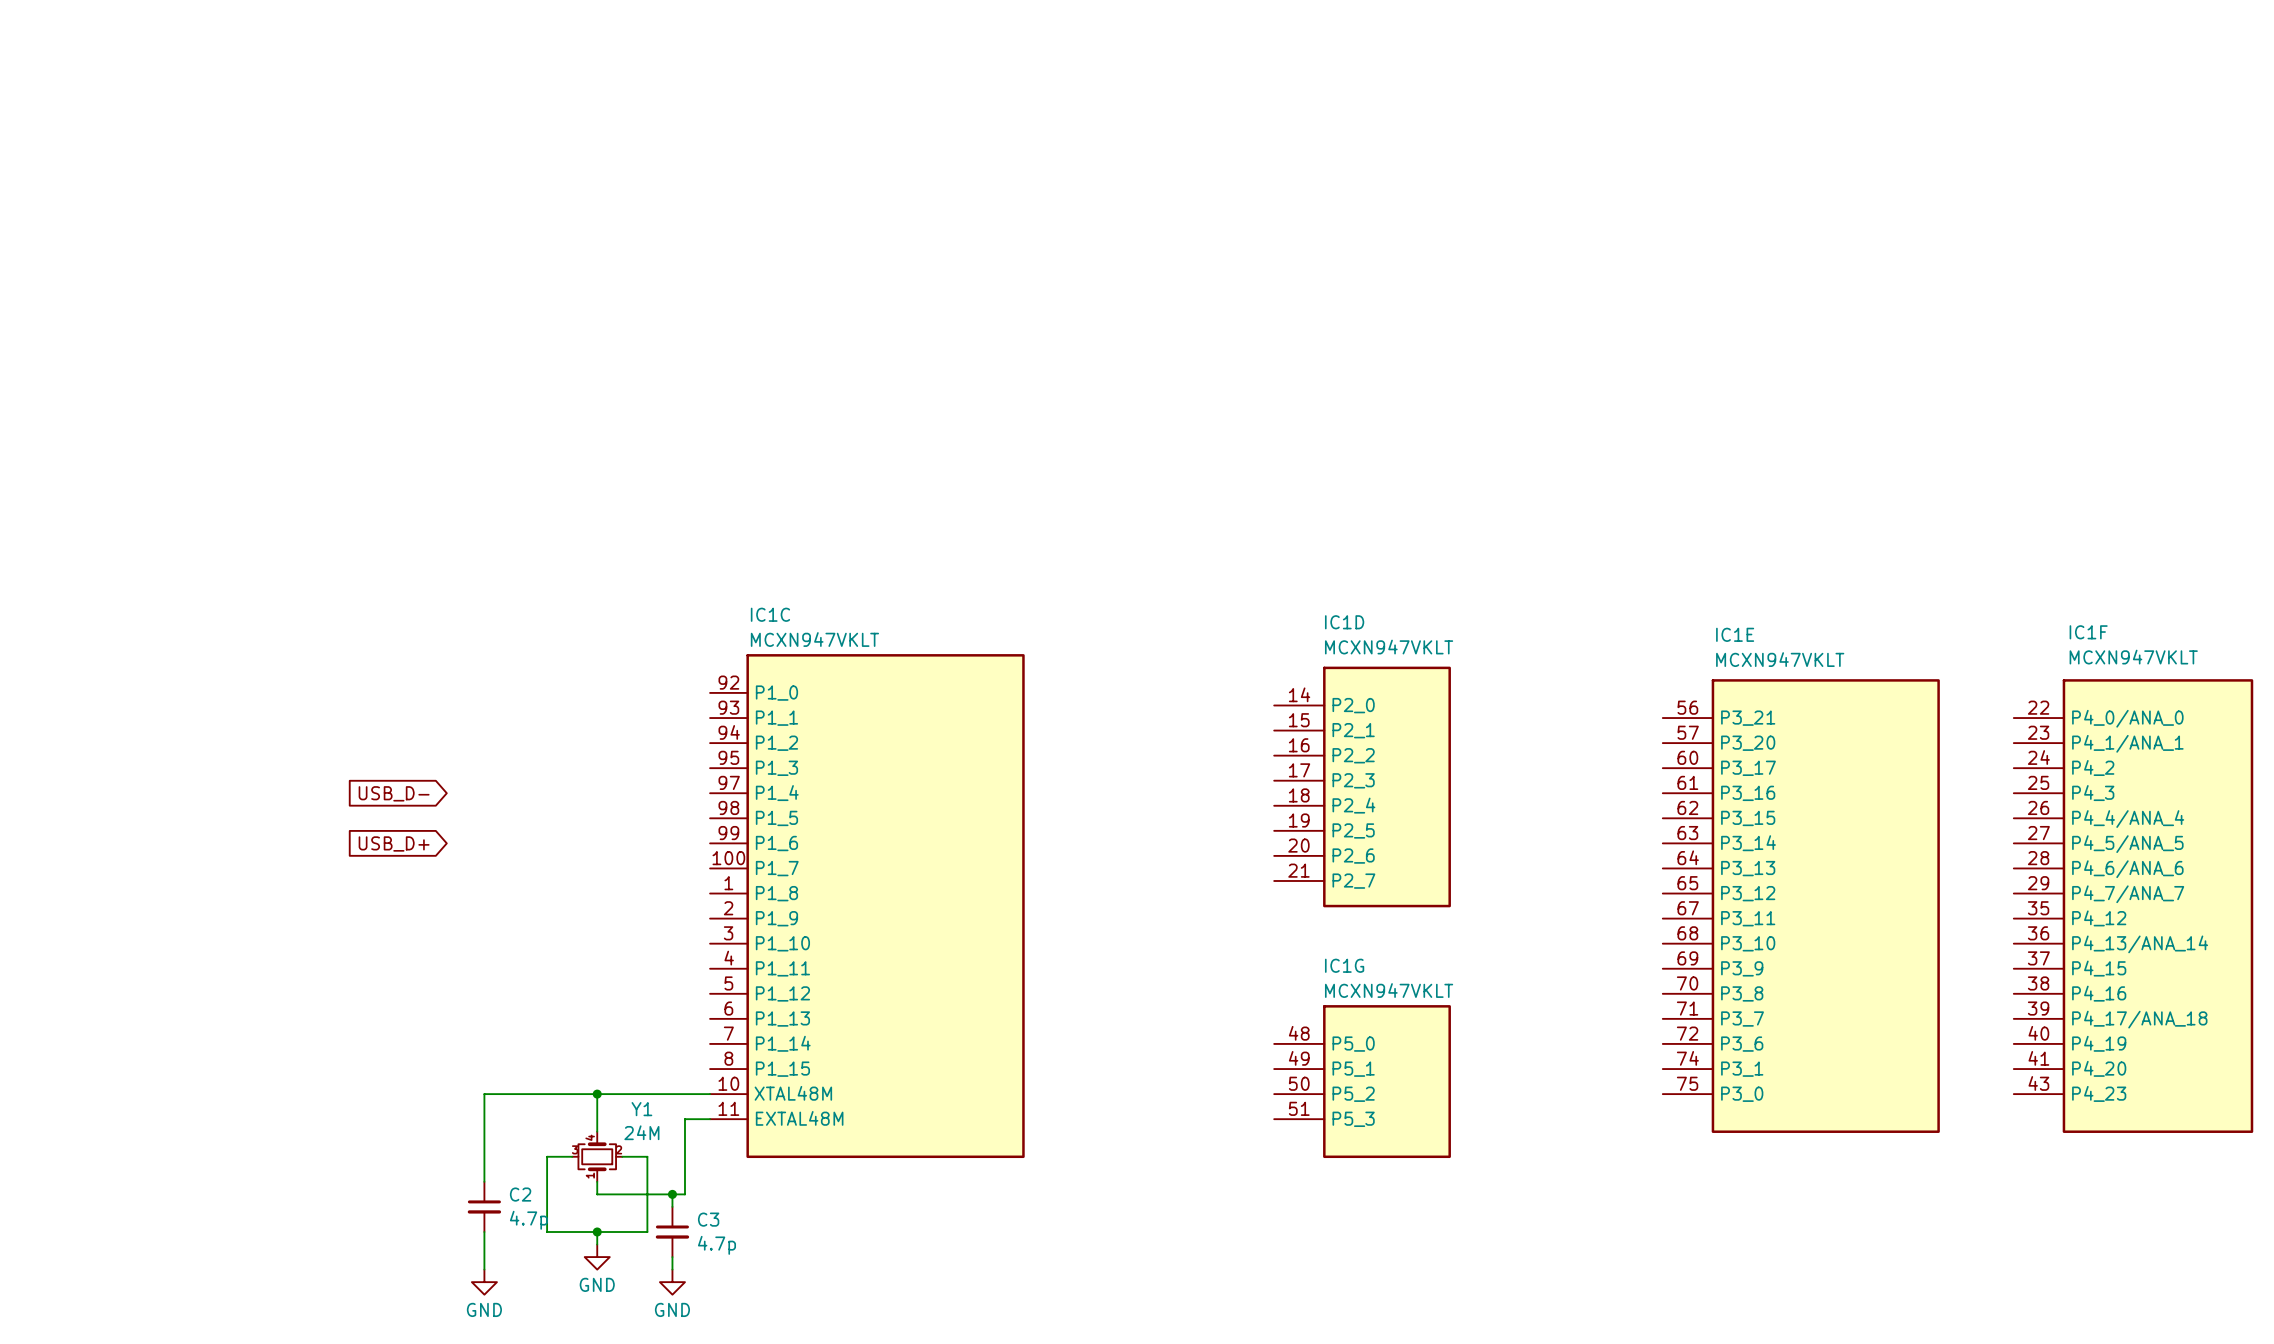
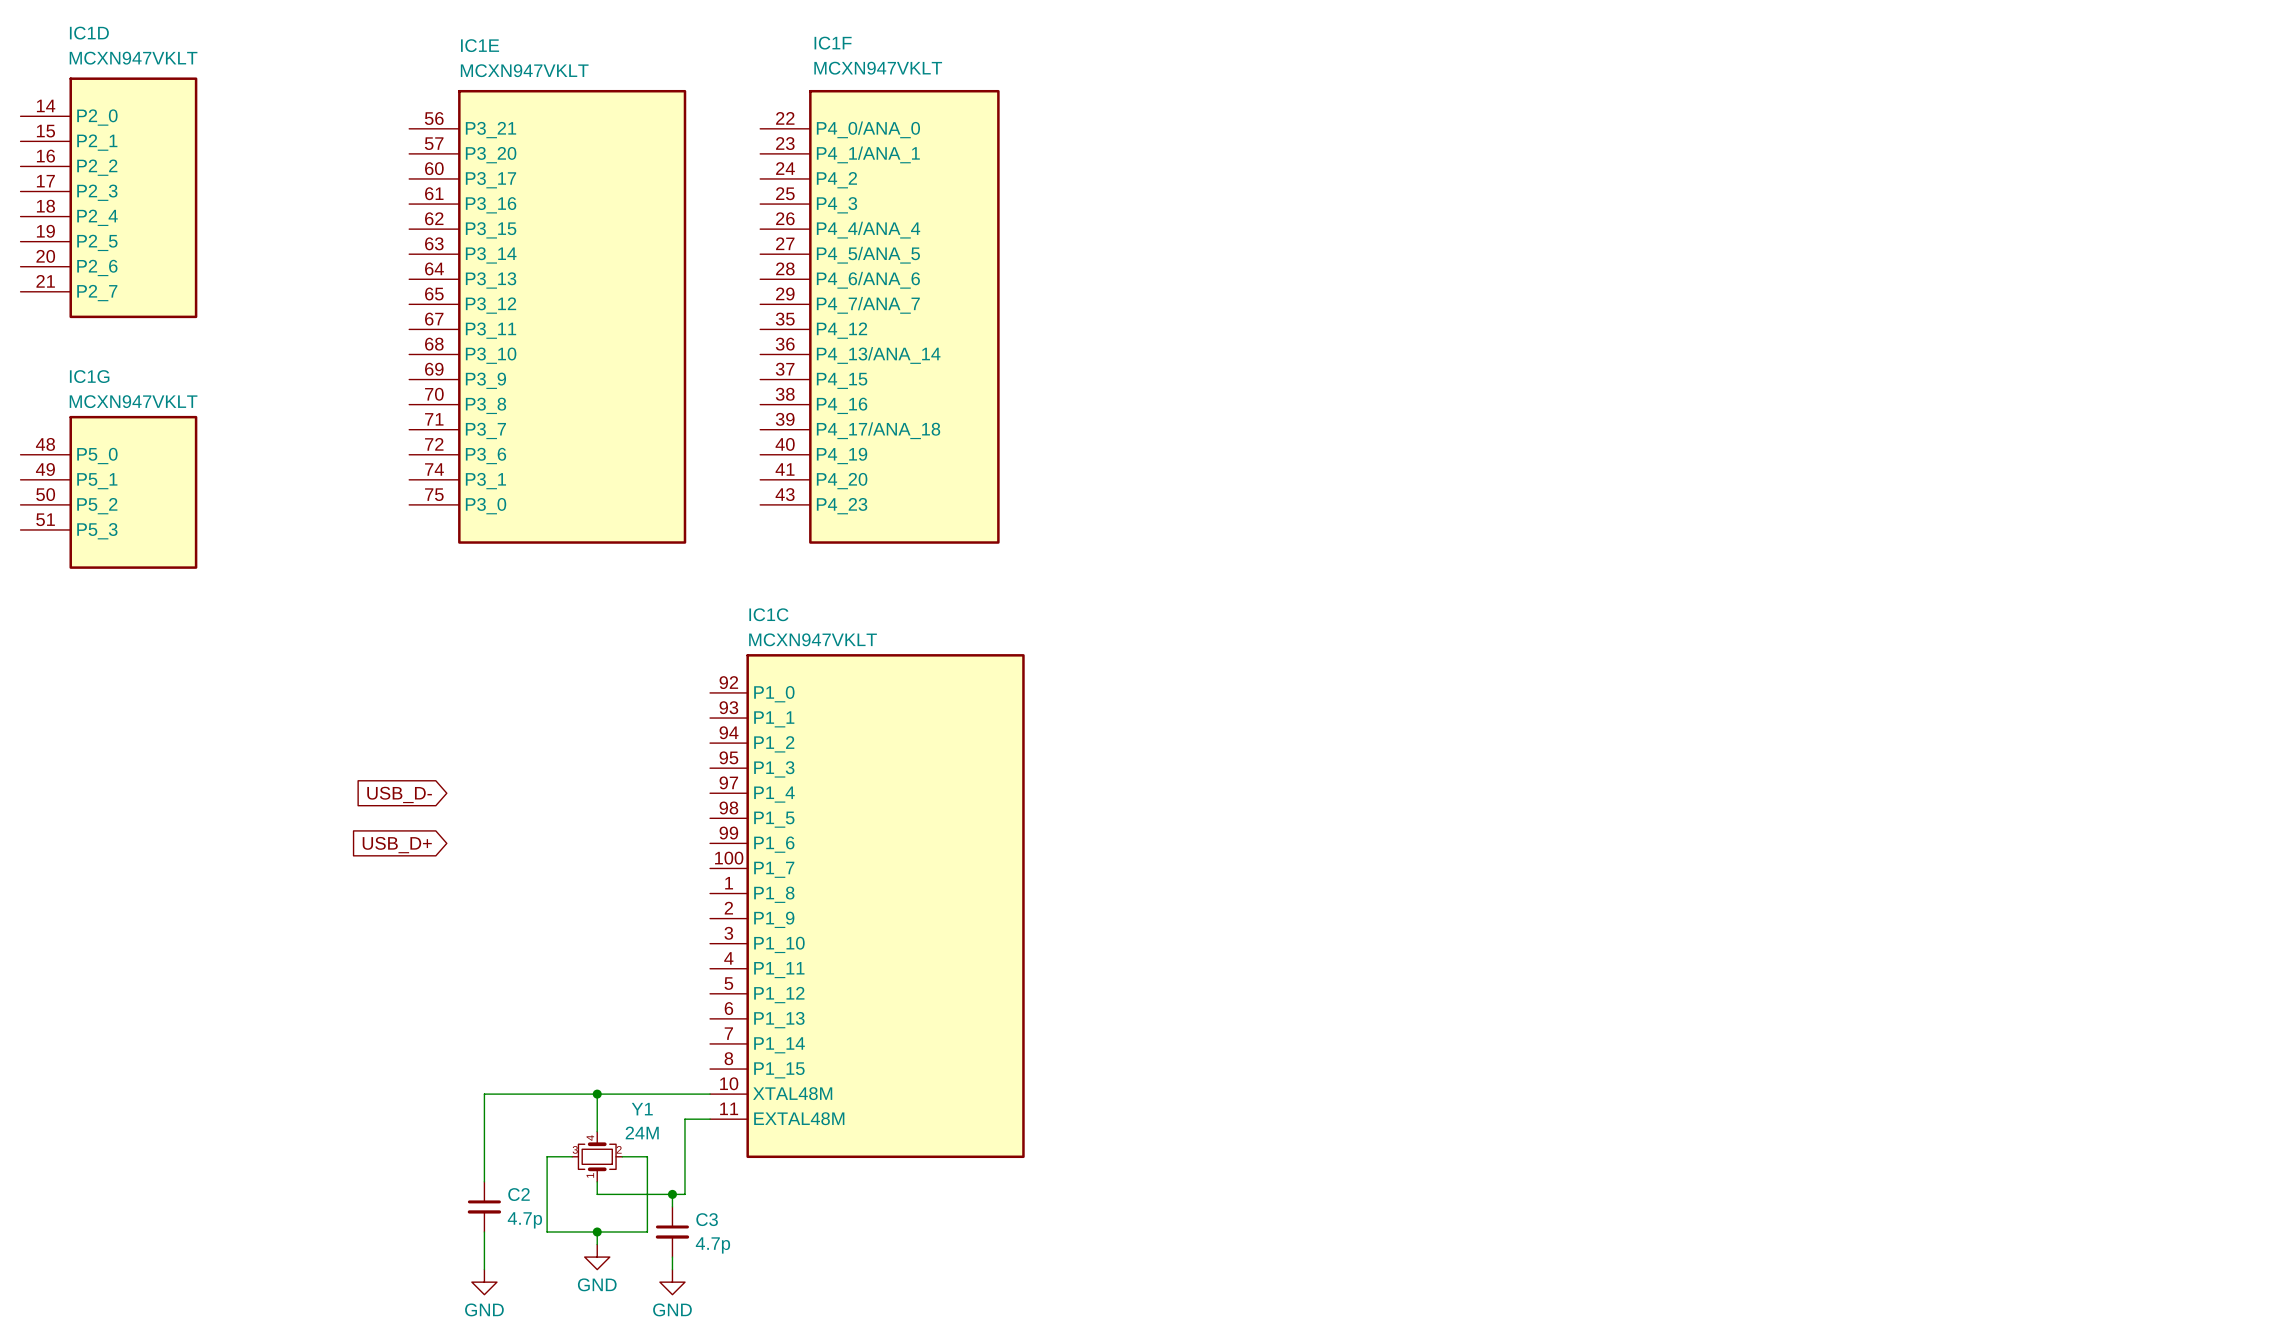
IC1D position: (1362, 786) -> (108, 197)
IC1E position: (1801, 906) -> (547, 316)
IC1F position: (2133, 906) -> (879, 316)
IC1G position: (1362, 1081) -> (108, 492)

